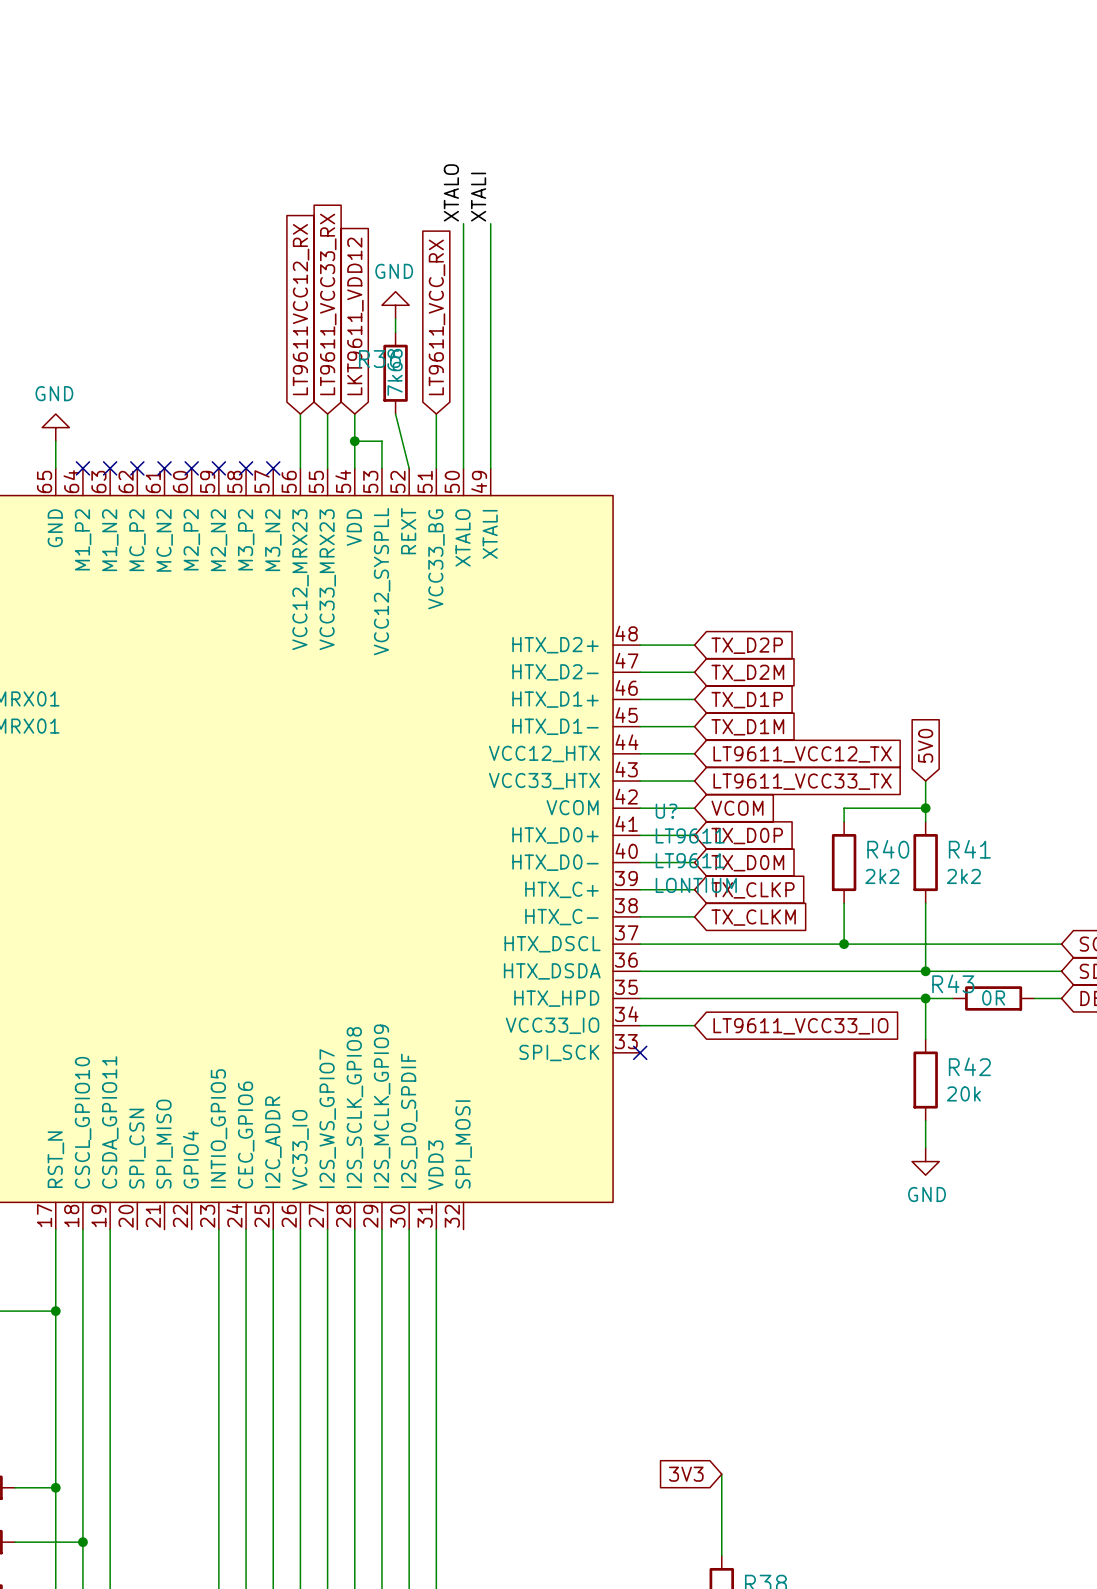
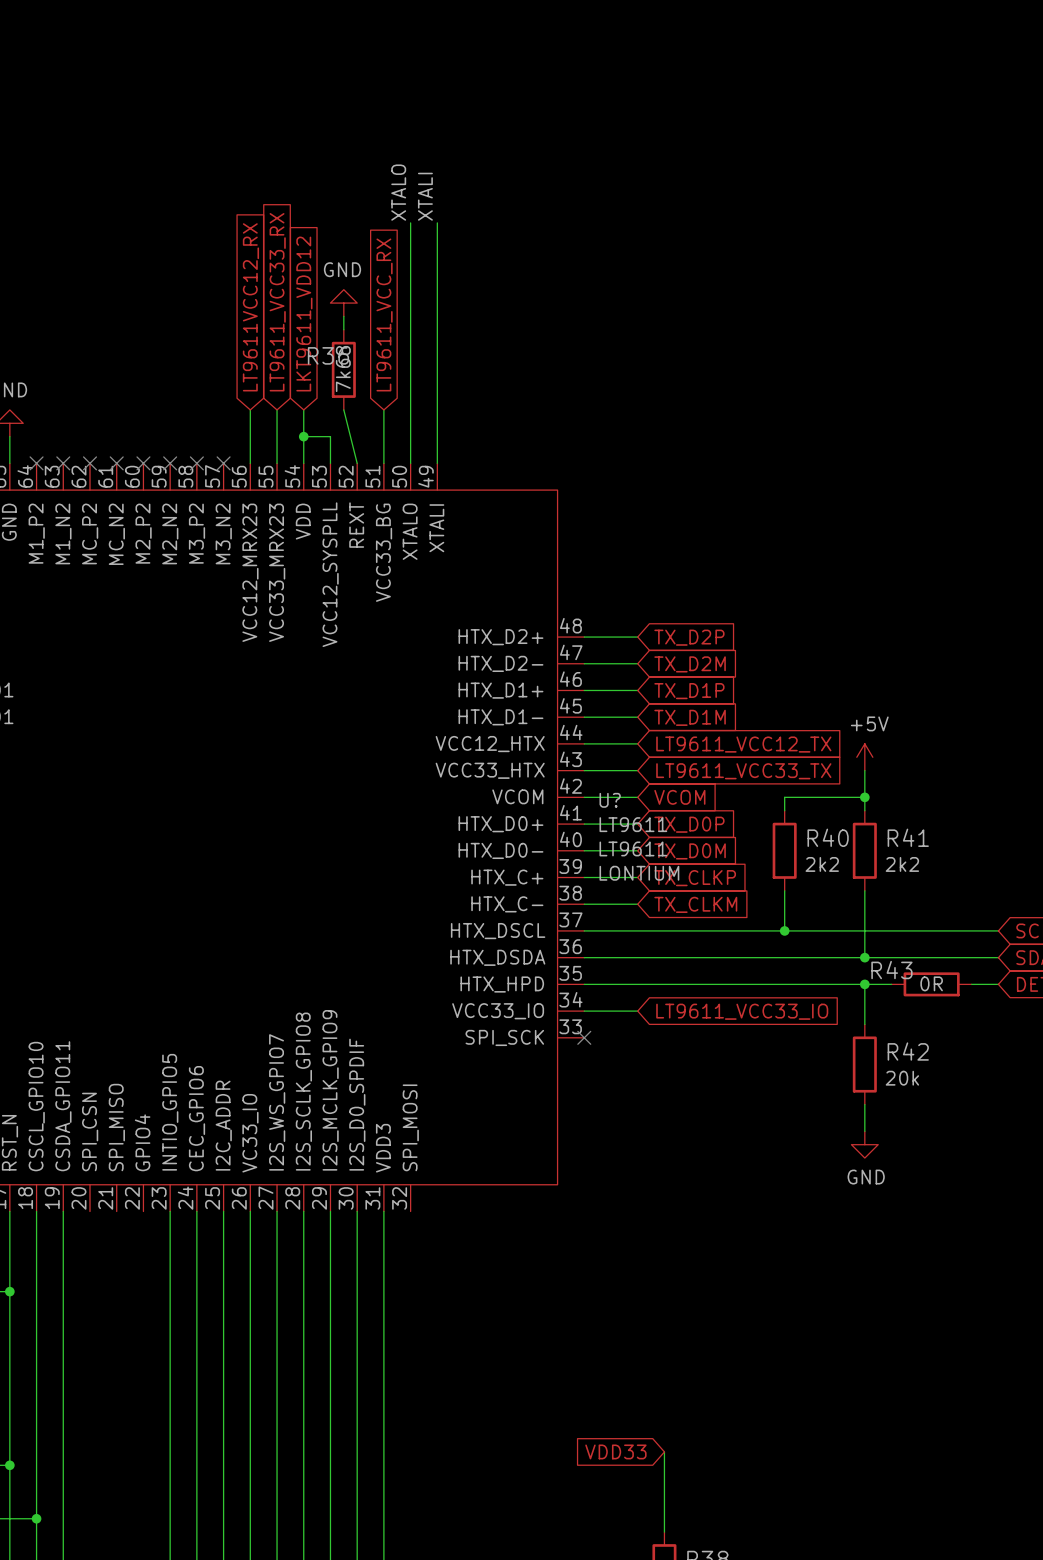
global label: 5V0 (925, 745) -> none
power symbol: none -> +5V (864, 757)
global label: 3V3 (686, 1474) -> VDD33 (615, 1451)

